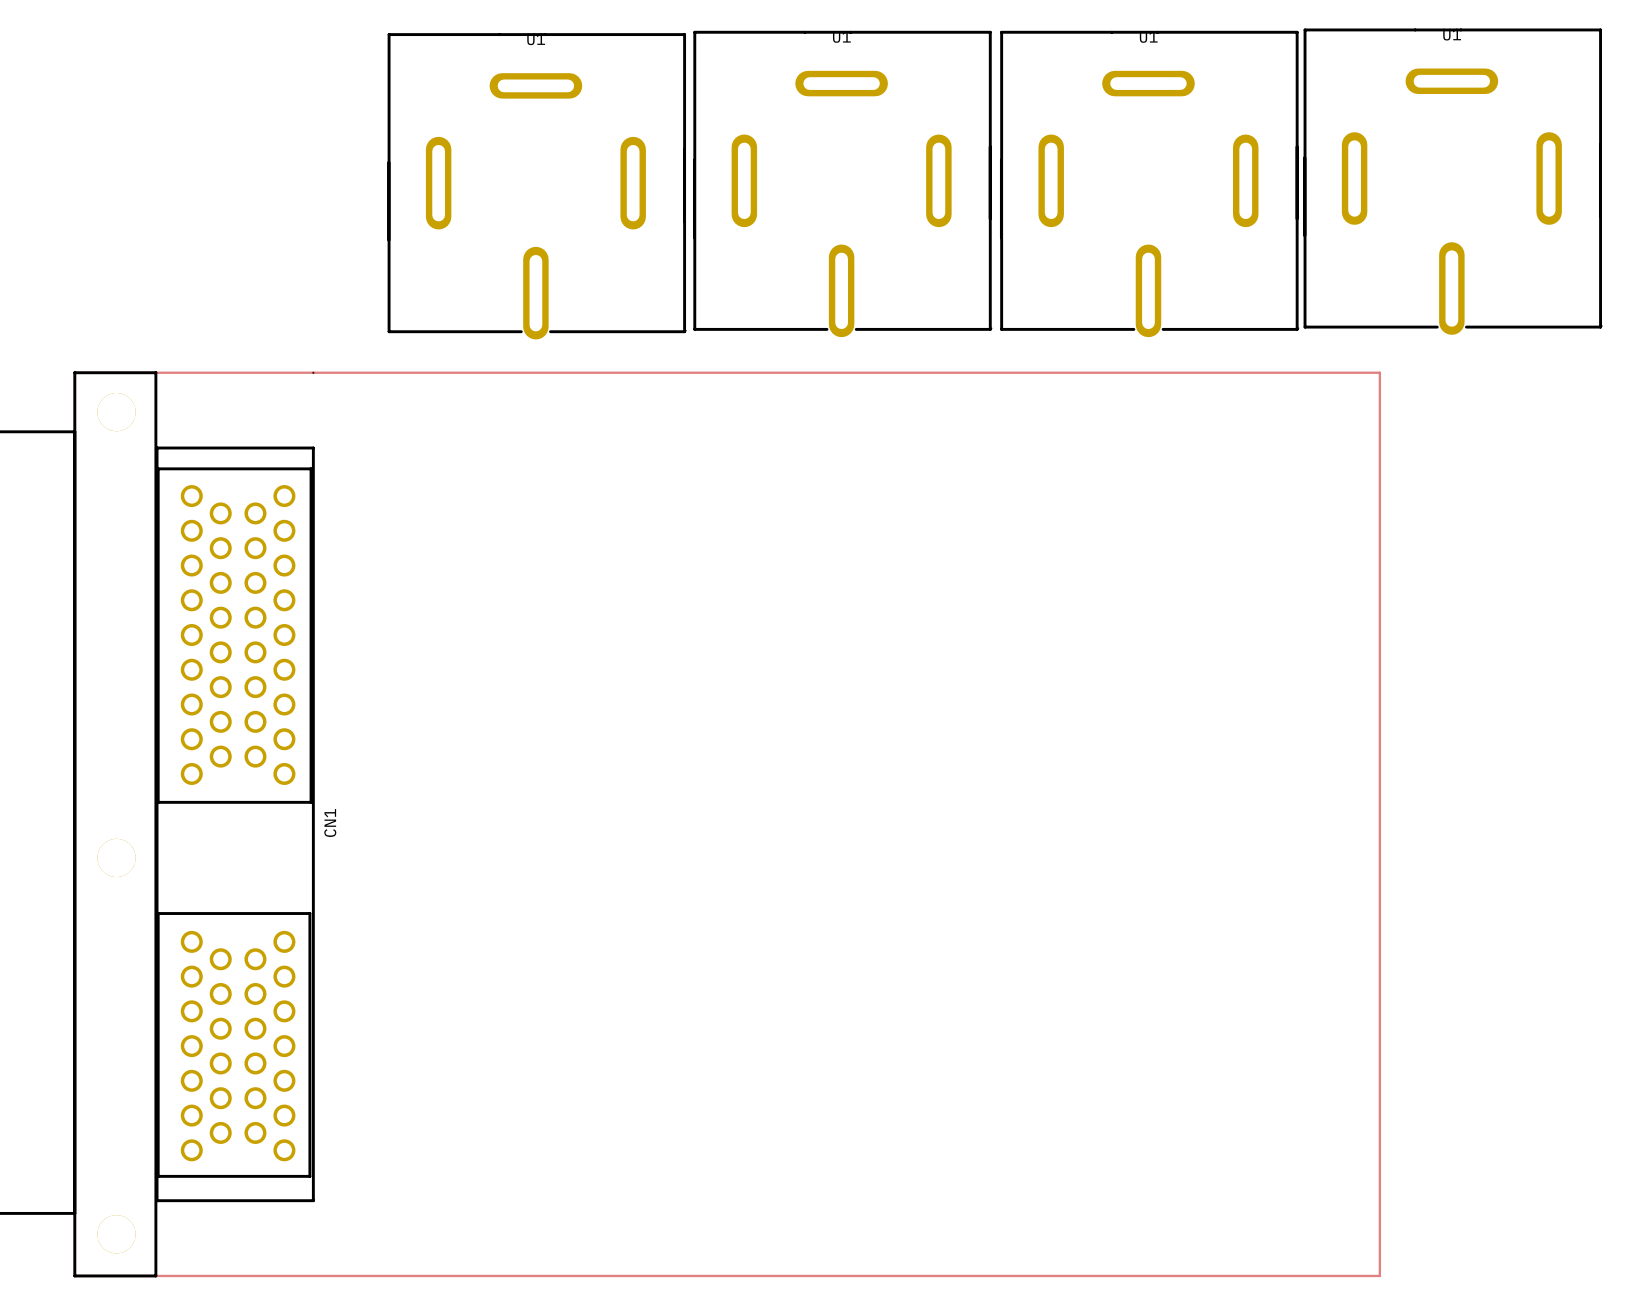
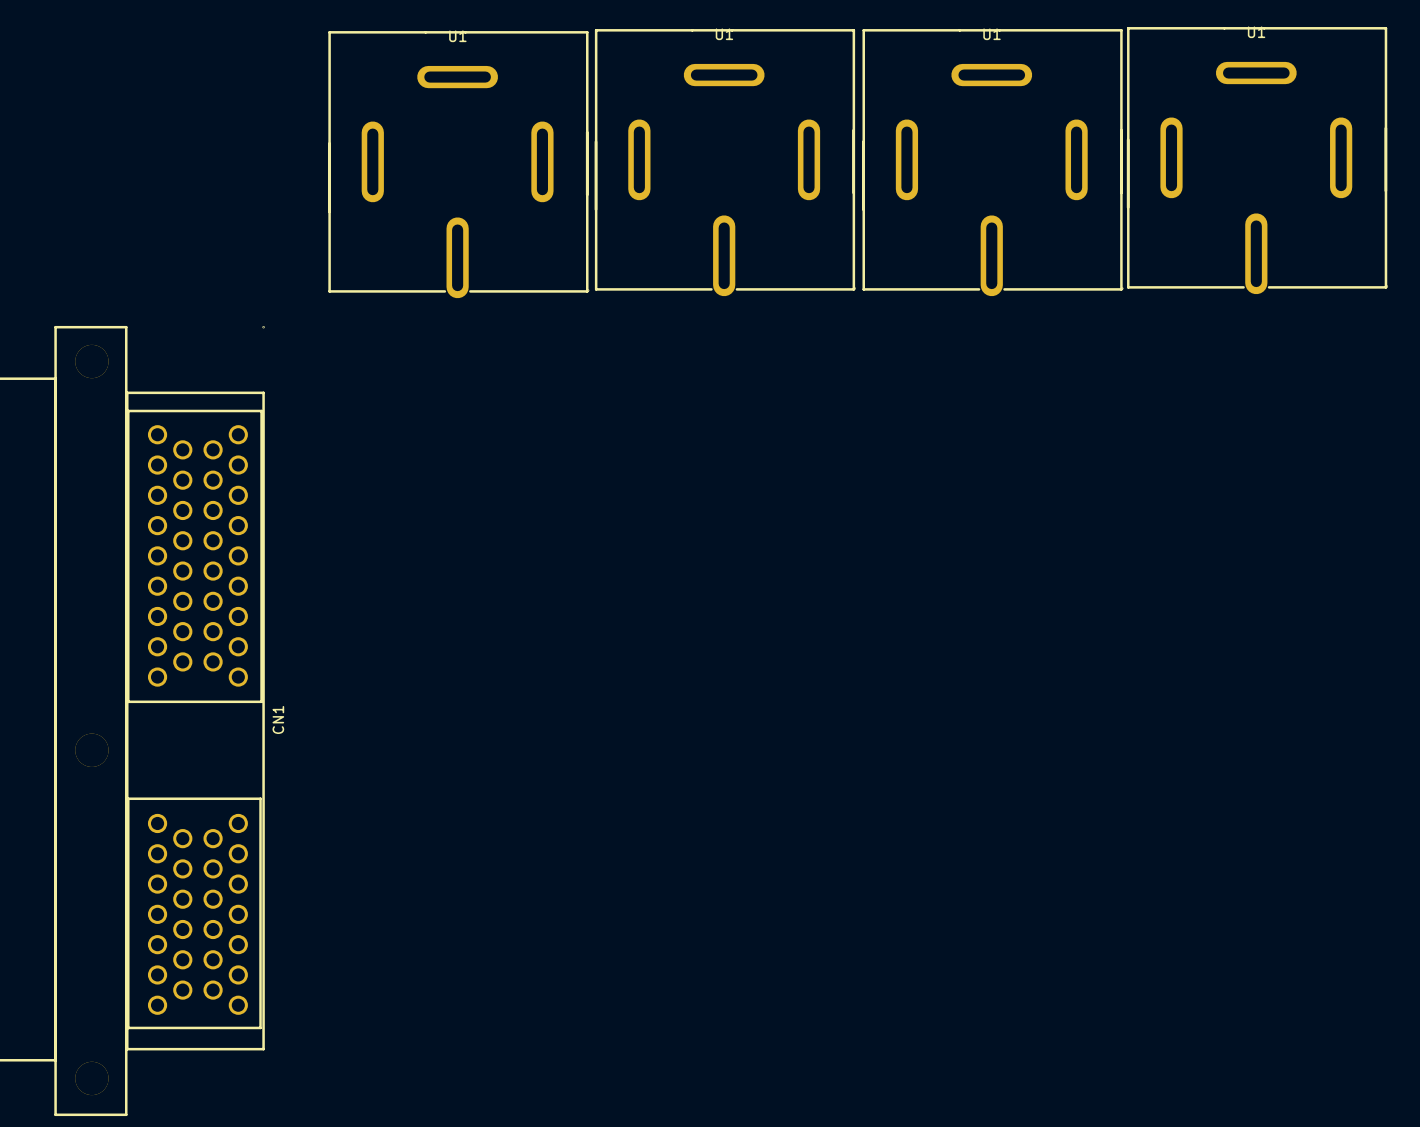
top track: (74, 372) (1379, 372) (1379, 1275) (74, 1275) (74, 372) -> none

